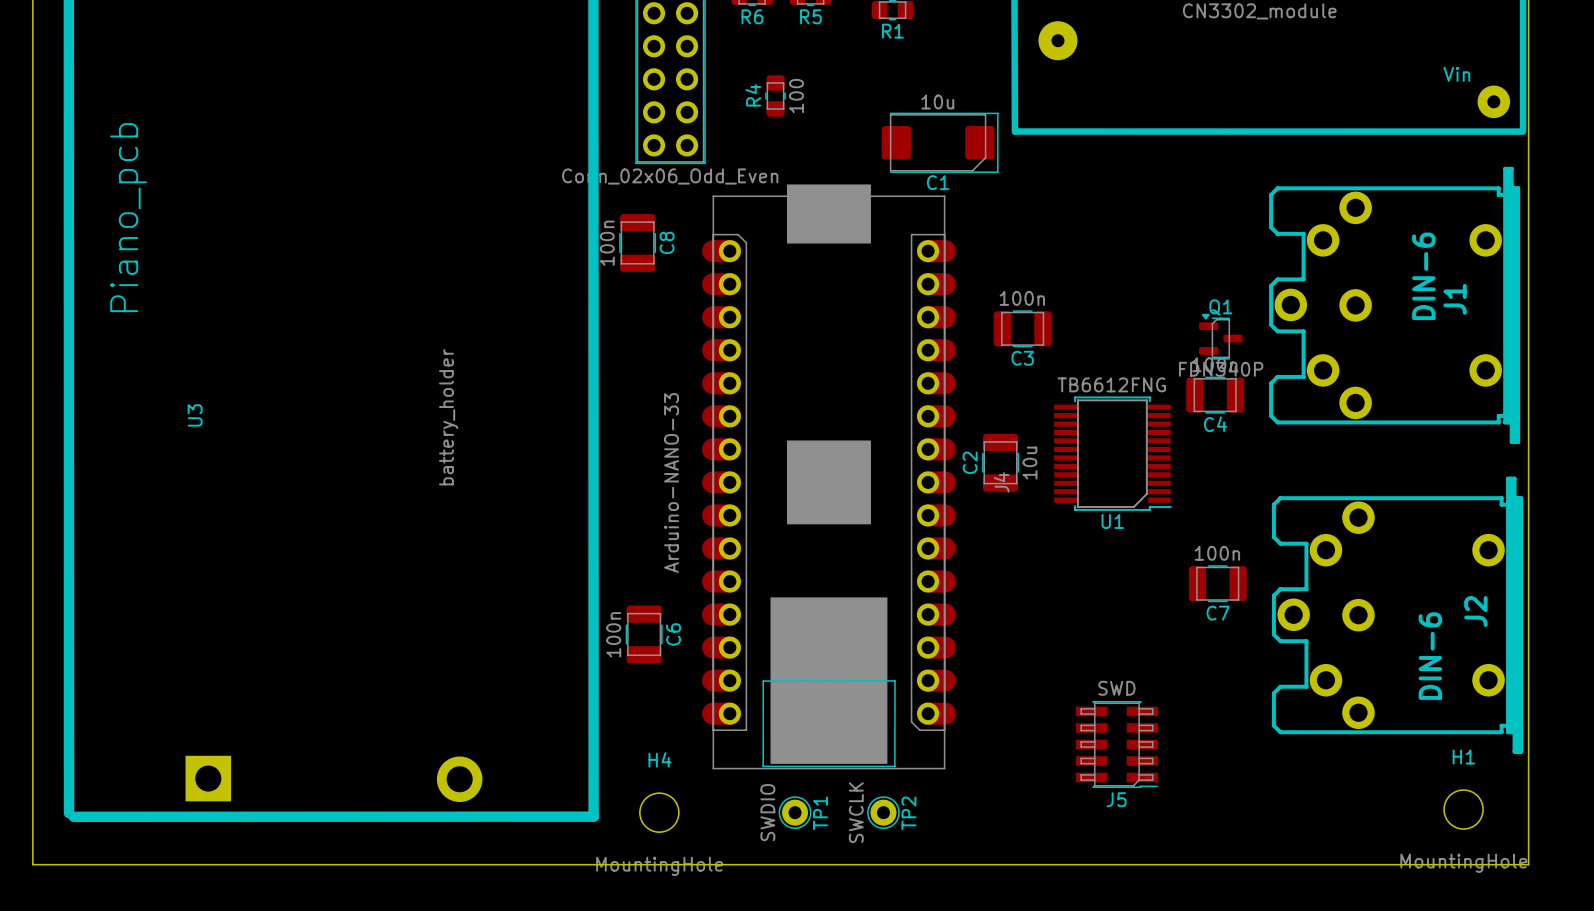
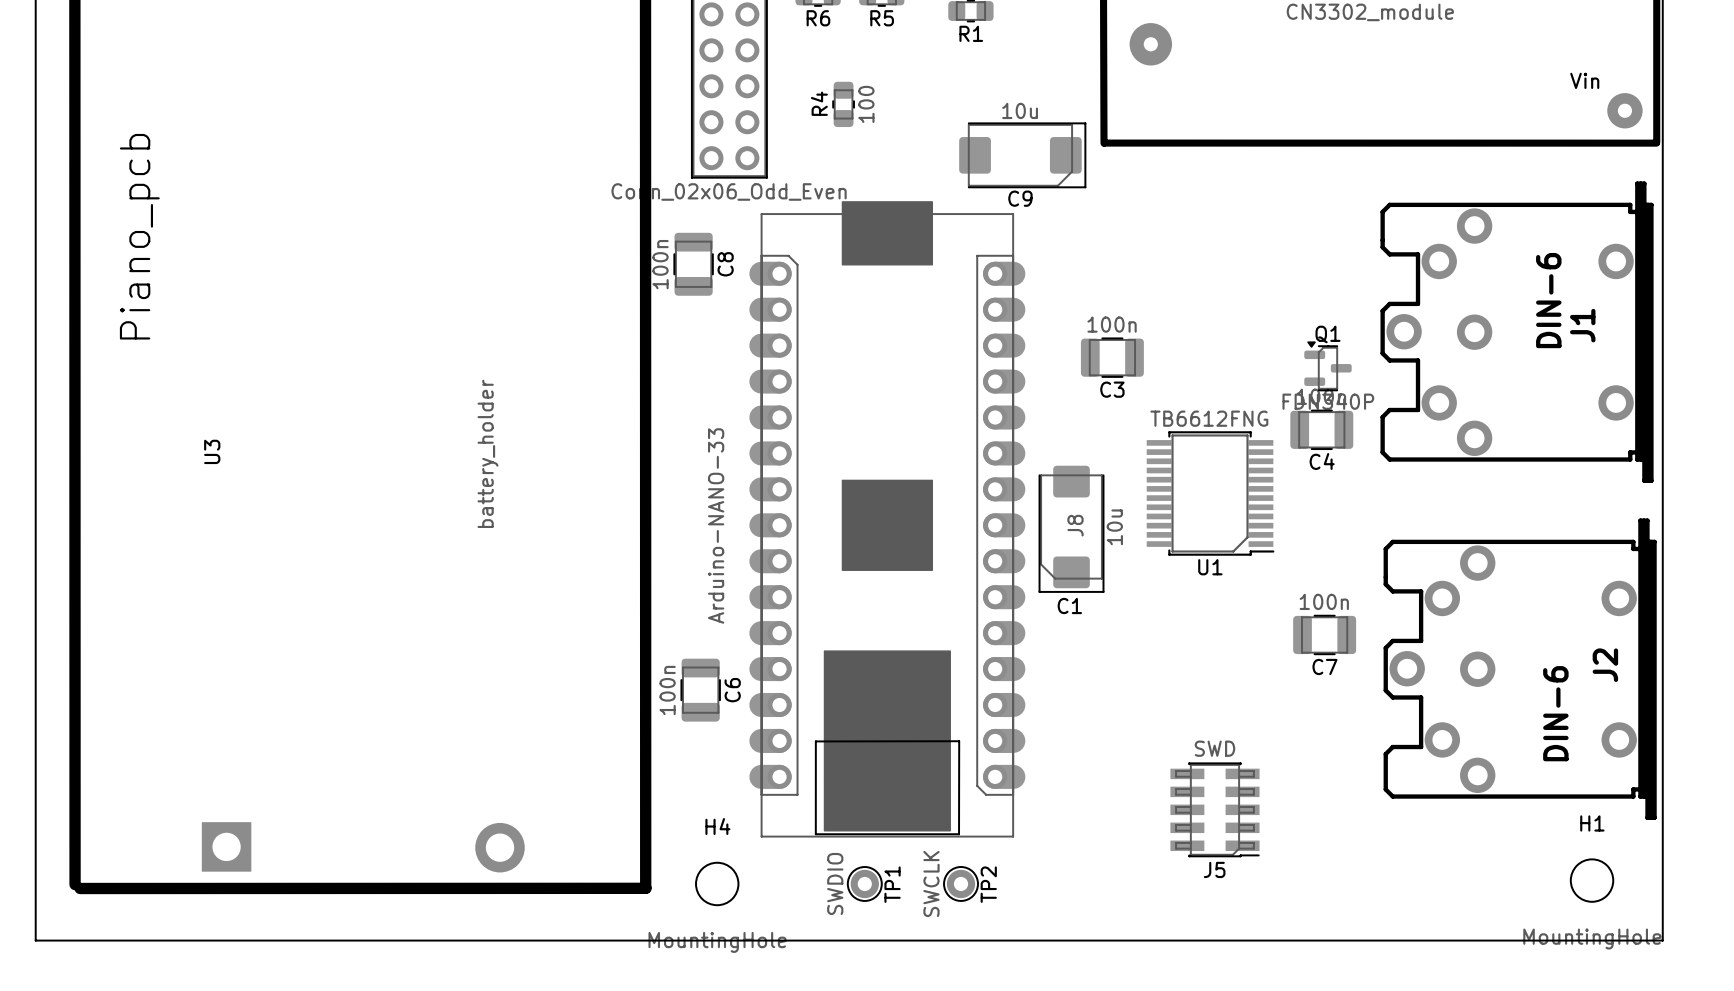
C1 name: C1 (938, 182) -> C9 (1020, 198)
C2: 10u (1000, 462) -> none
J4: Arduino-NANO-33 (828, 476) -> none
J8: none -> Arduino-NANO-33 (887, 519)
C1: none -> 10u (1071, 529)

